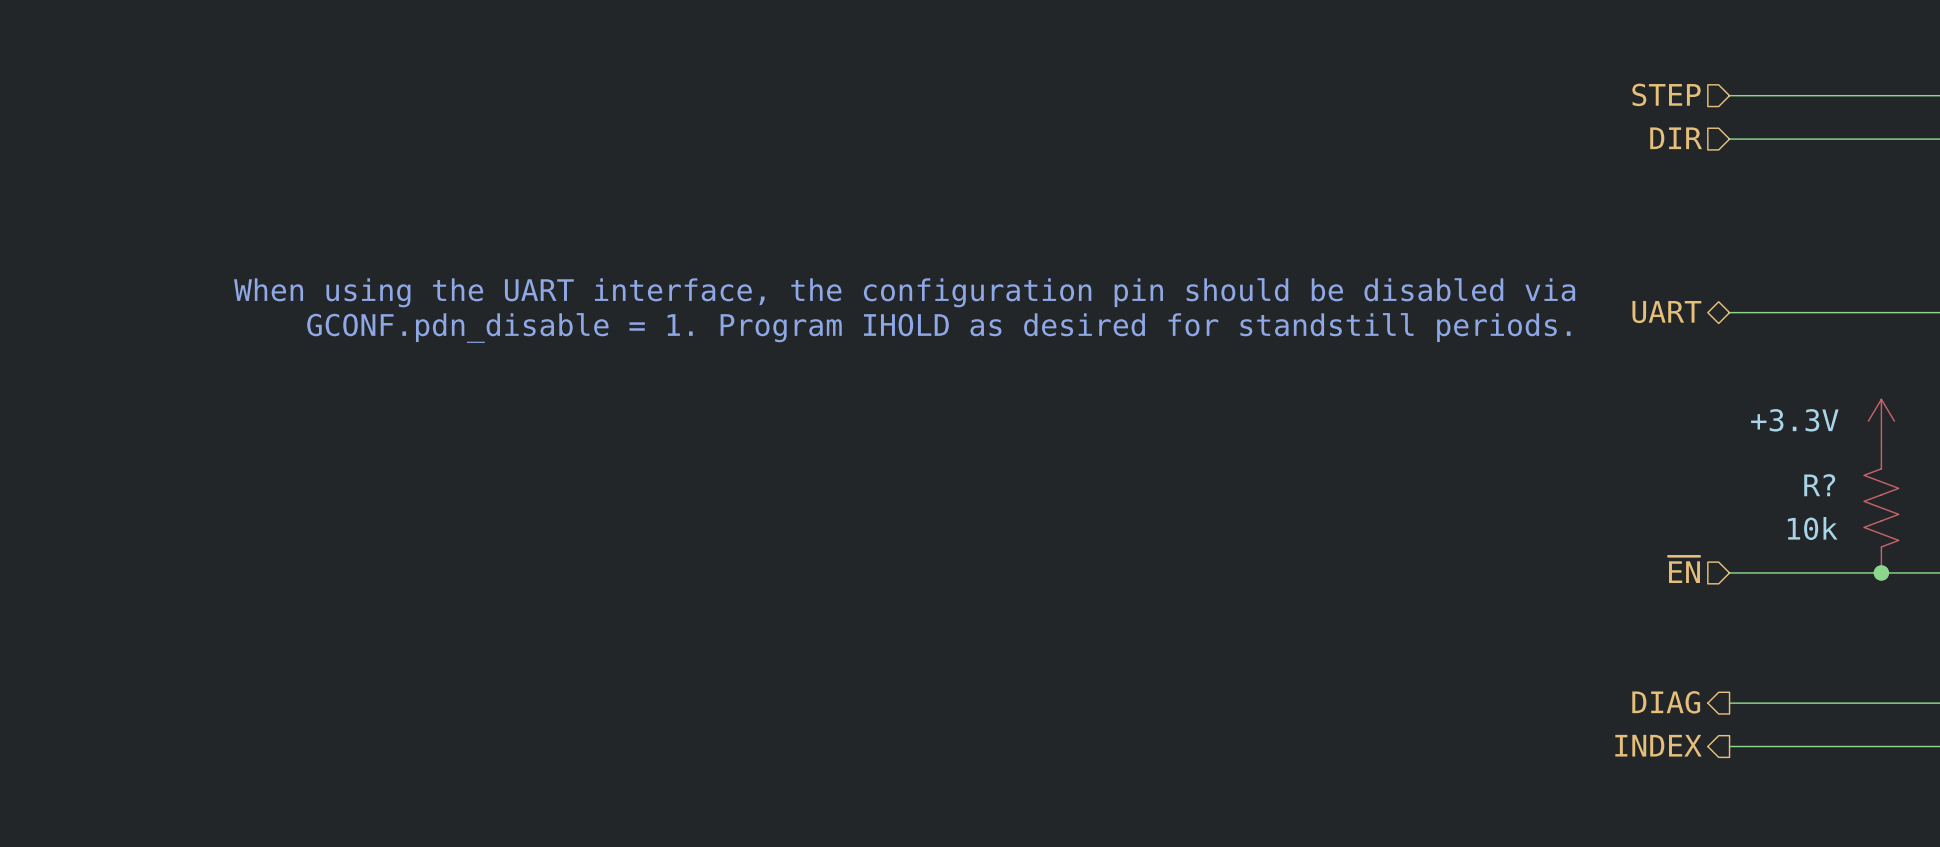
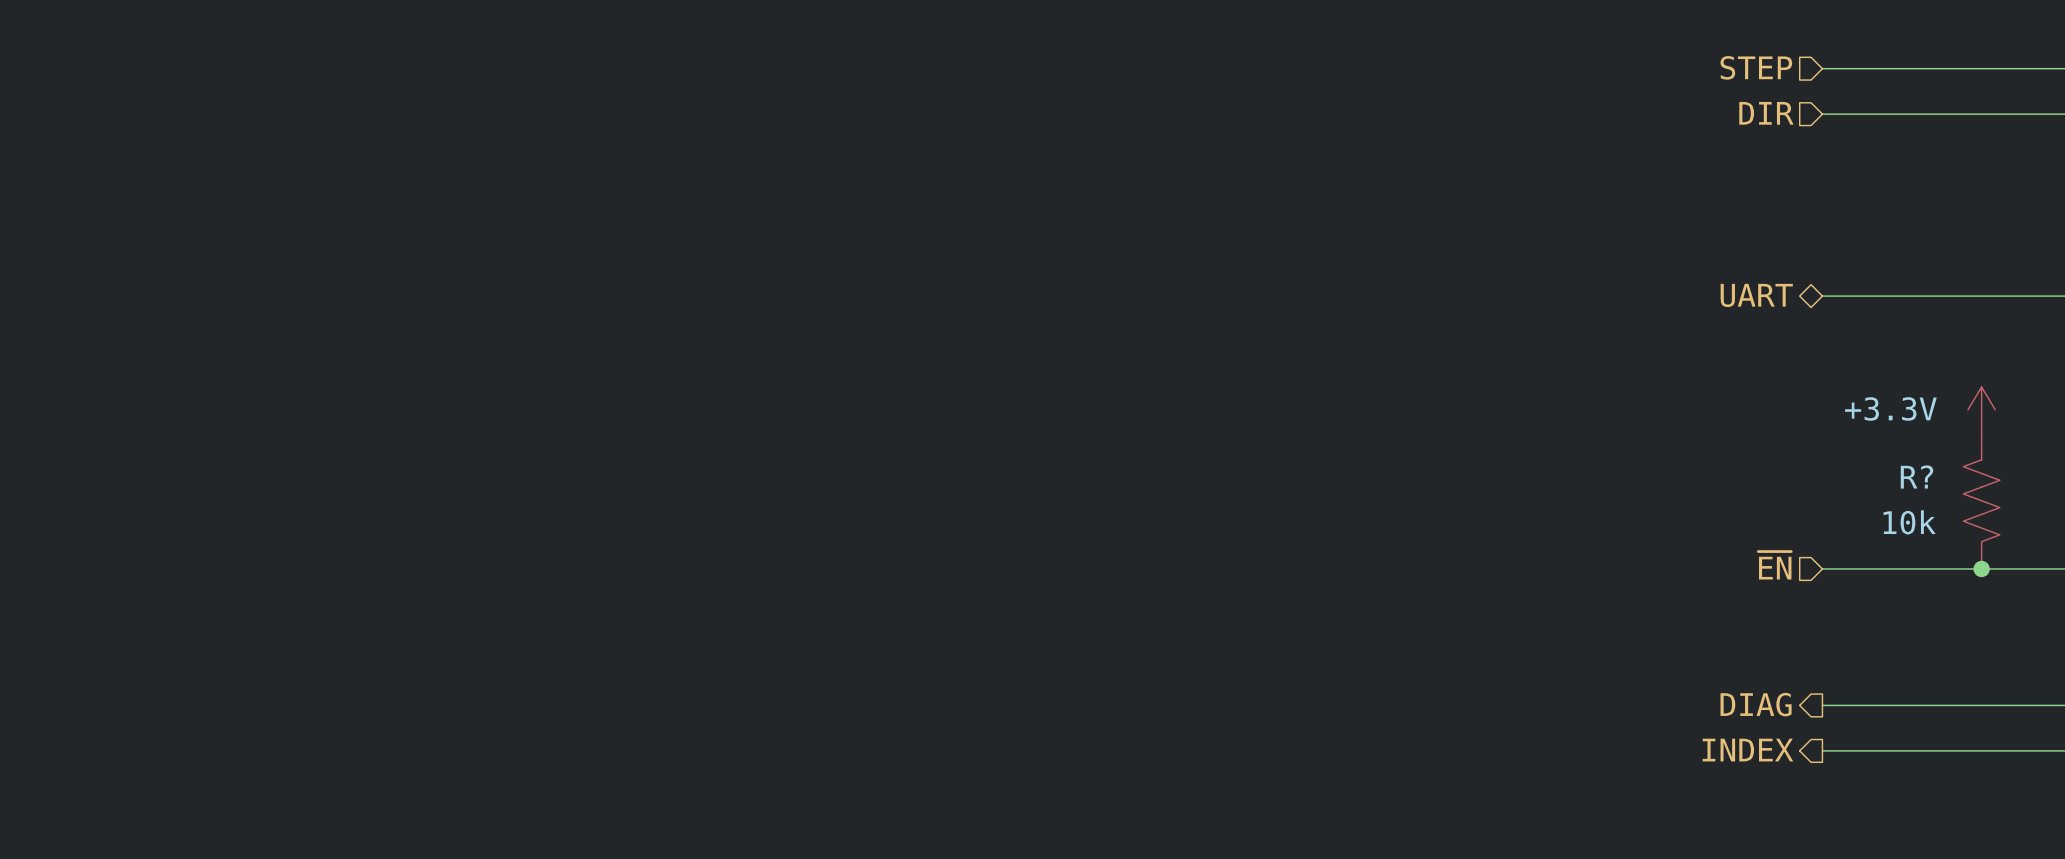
text: When using the UART interface, the configuration pin should be disabled via (904, 292) -> none
text: GCONF.pdn_disable = 1. Program IHOLD as desired for standstill periods. (938, 327) -> none

